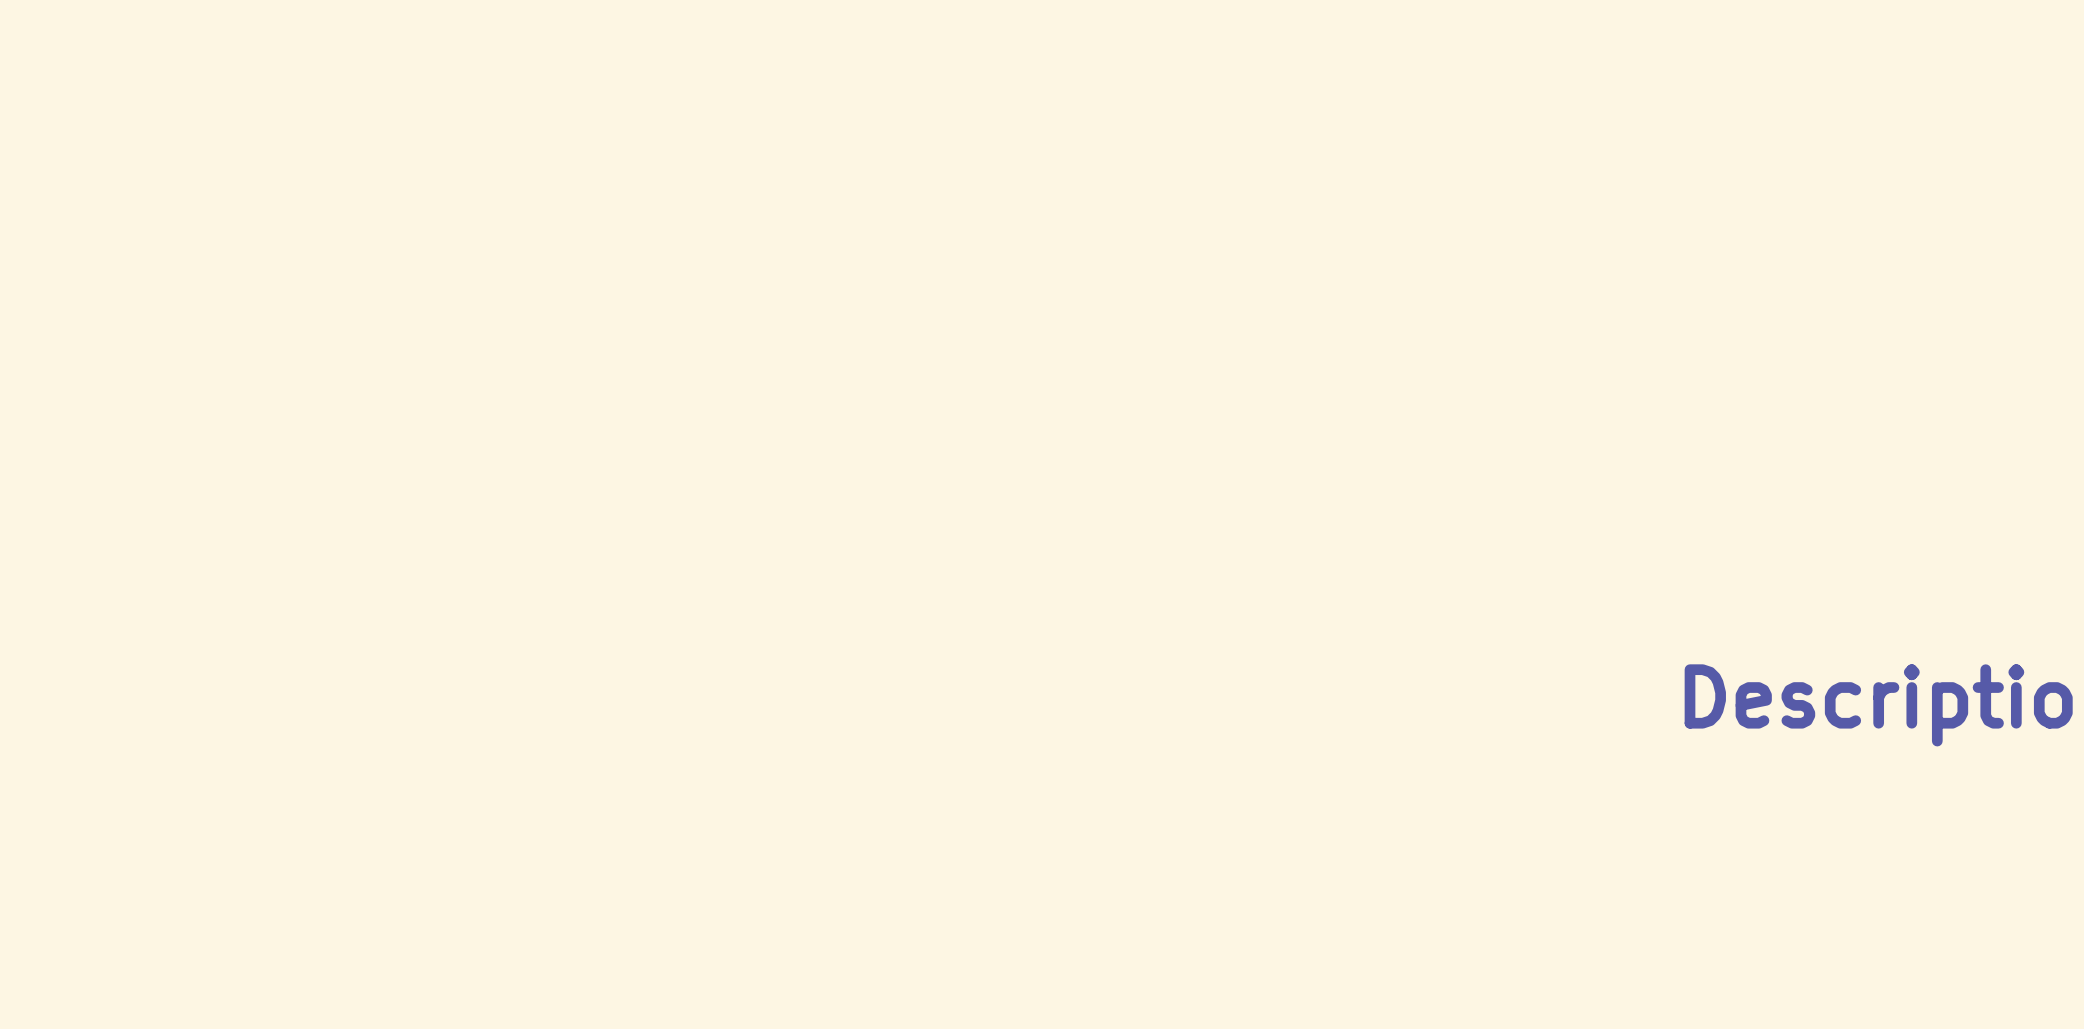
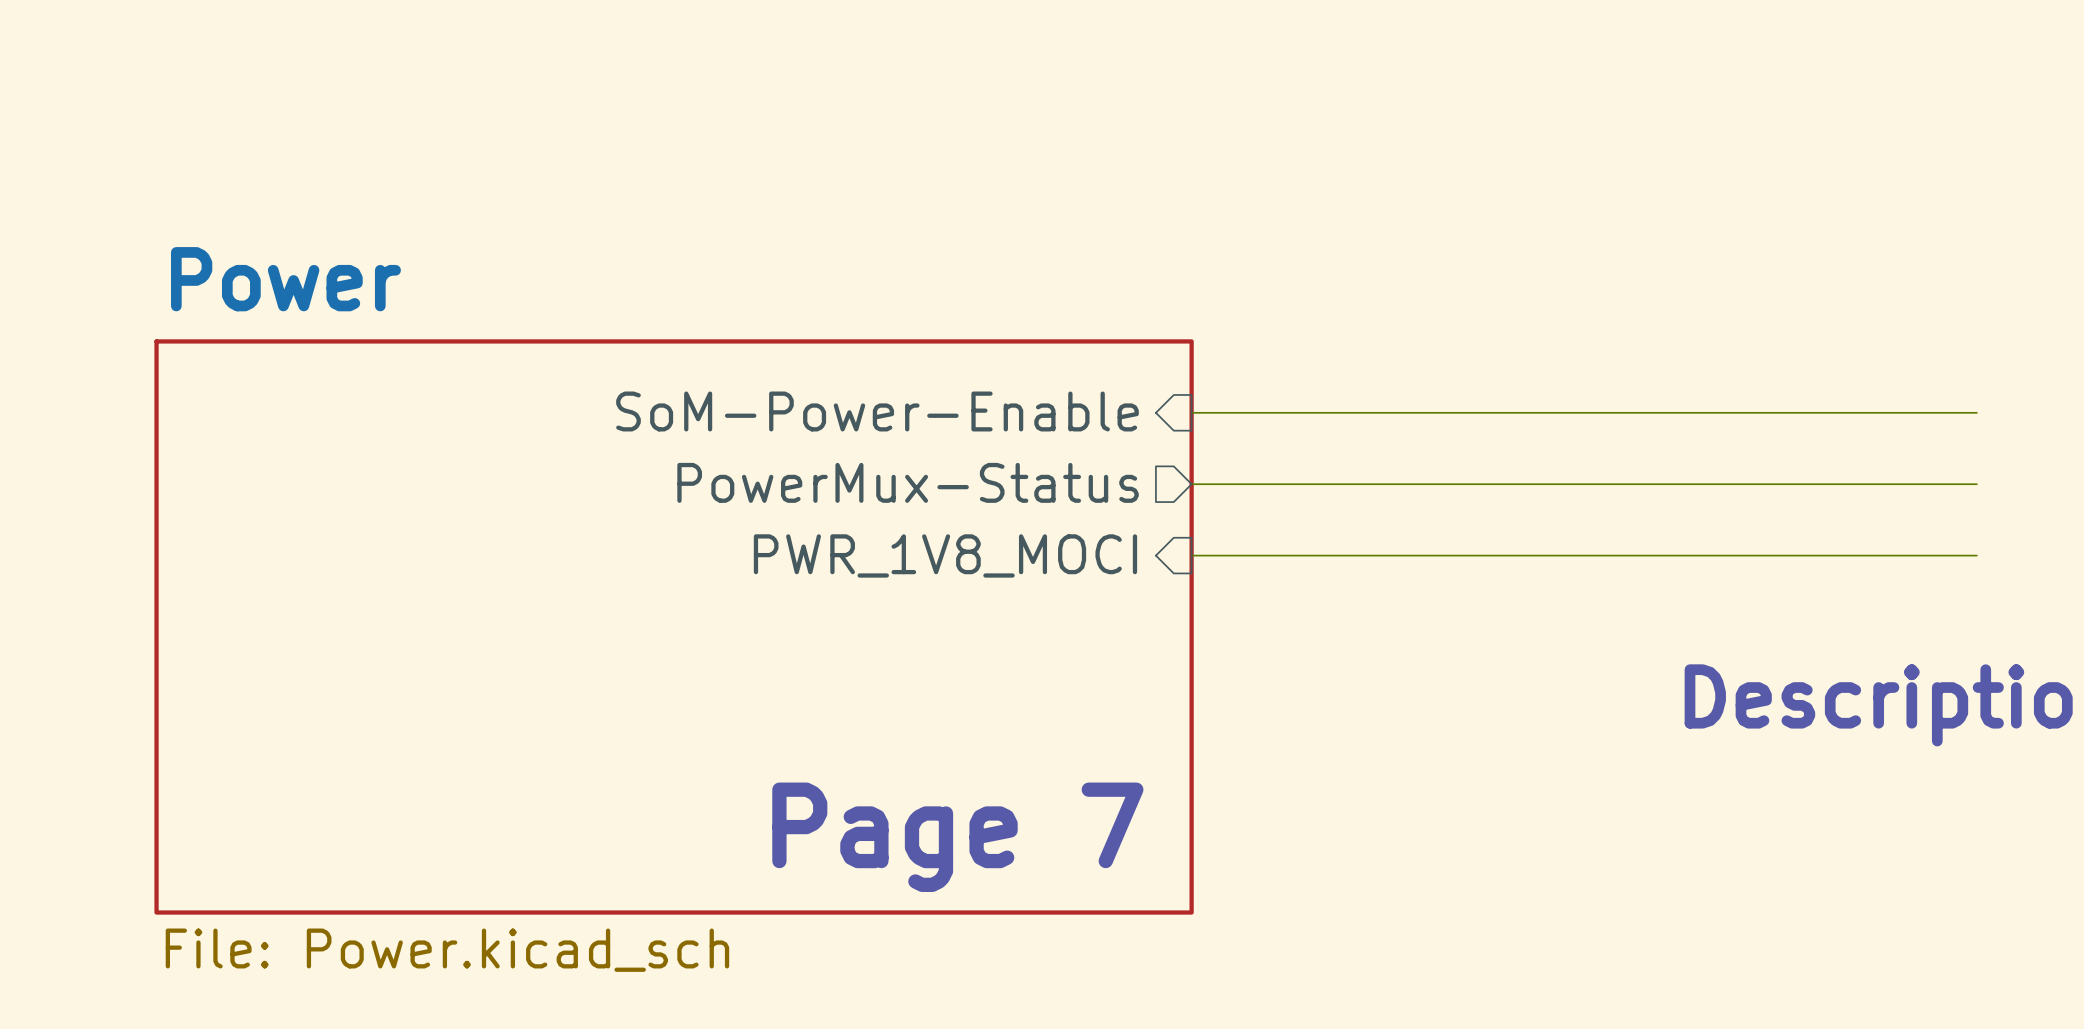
sheet pin: none -> SoM-Power-Enable (877, 411)
wire: none -> (1191, 412) (1976, 412)
sheet pin: none -> PowerMux-Status (908, 482)
wire: none -> (1191, 484) (1976, 484)
sheet pin: none -> PWR_1V8_MOCI (945, 555)
wire: none -> (1191, 555) (1976, 555)
sheet Power: none -> File: Power.kicad_sch (674, 626)
text: none -> Page 7 (957, 837)

